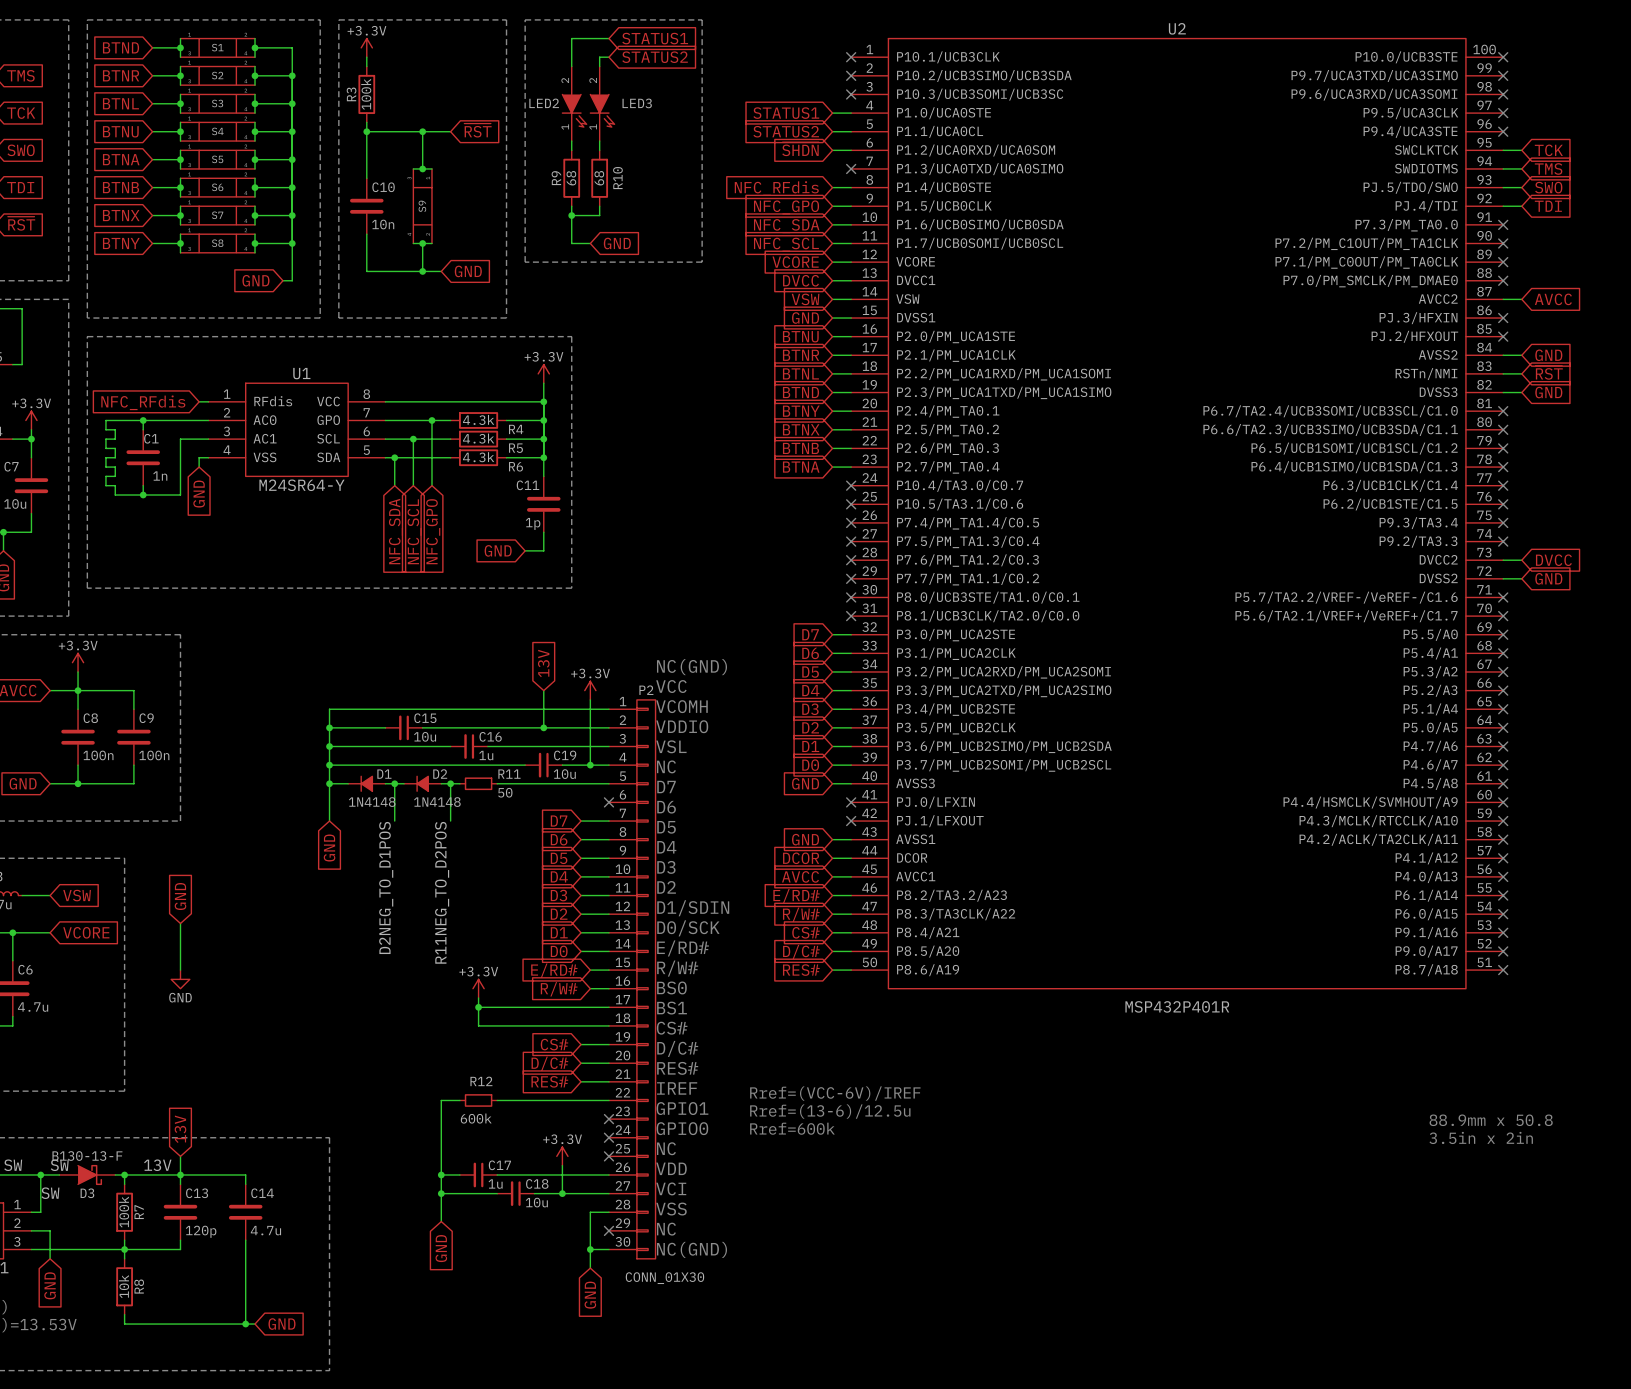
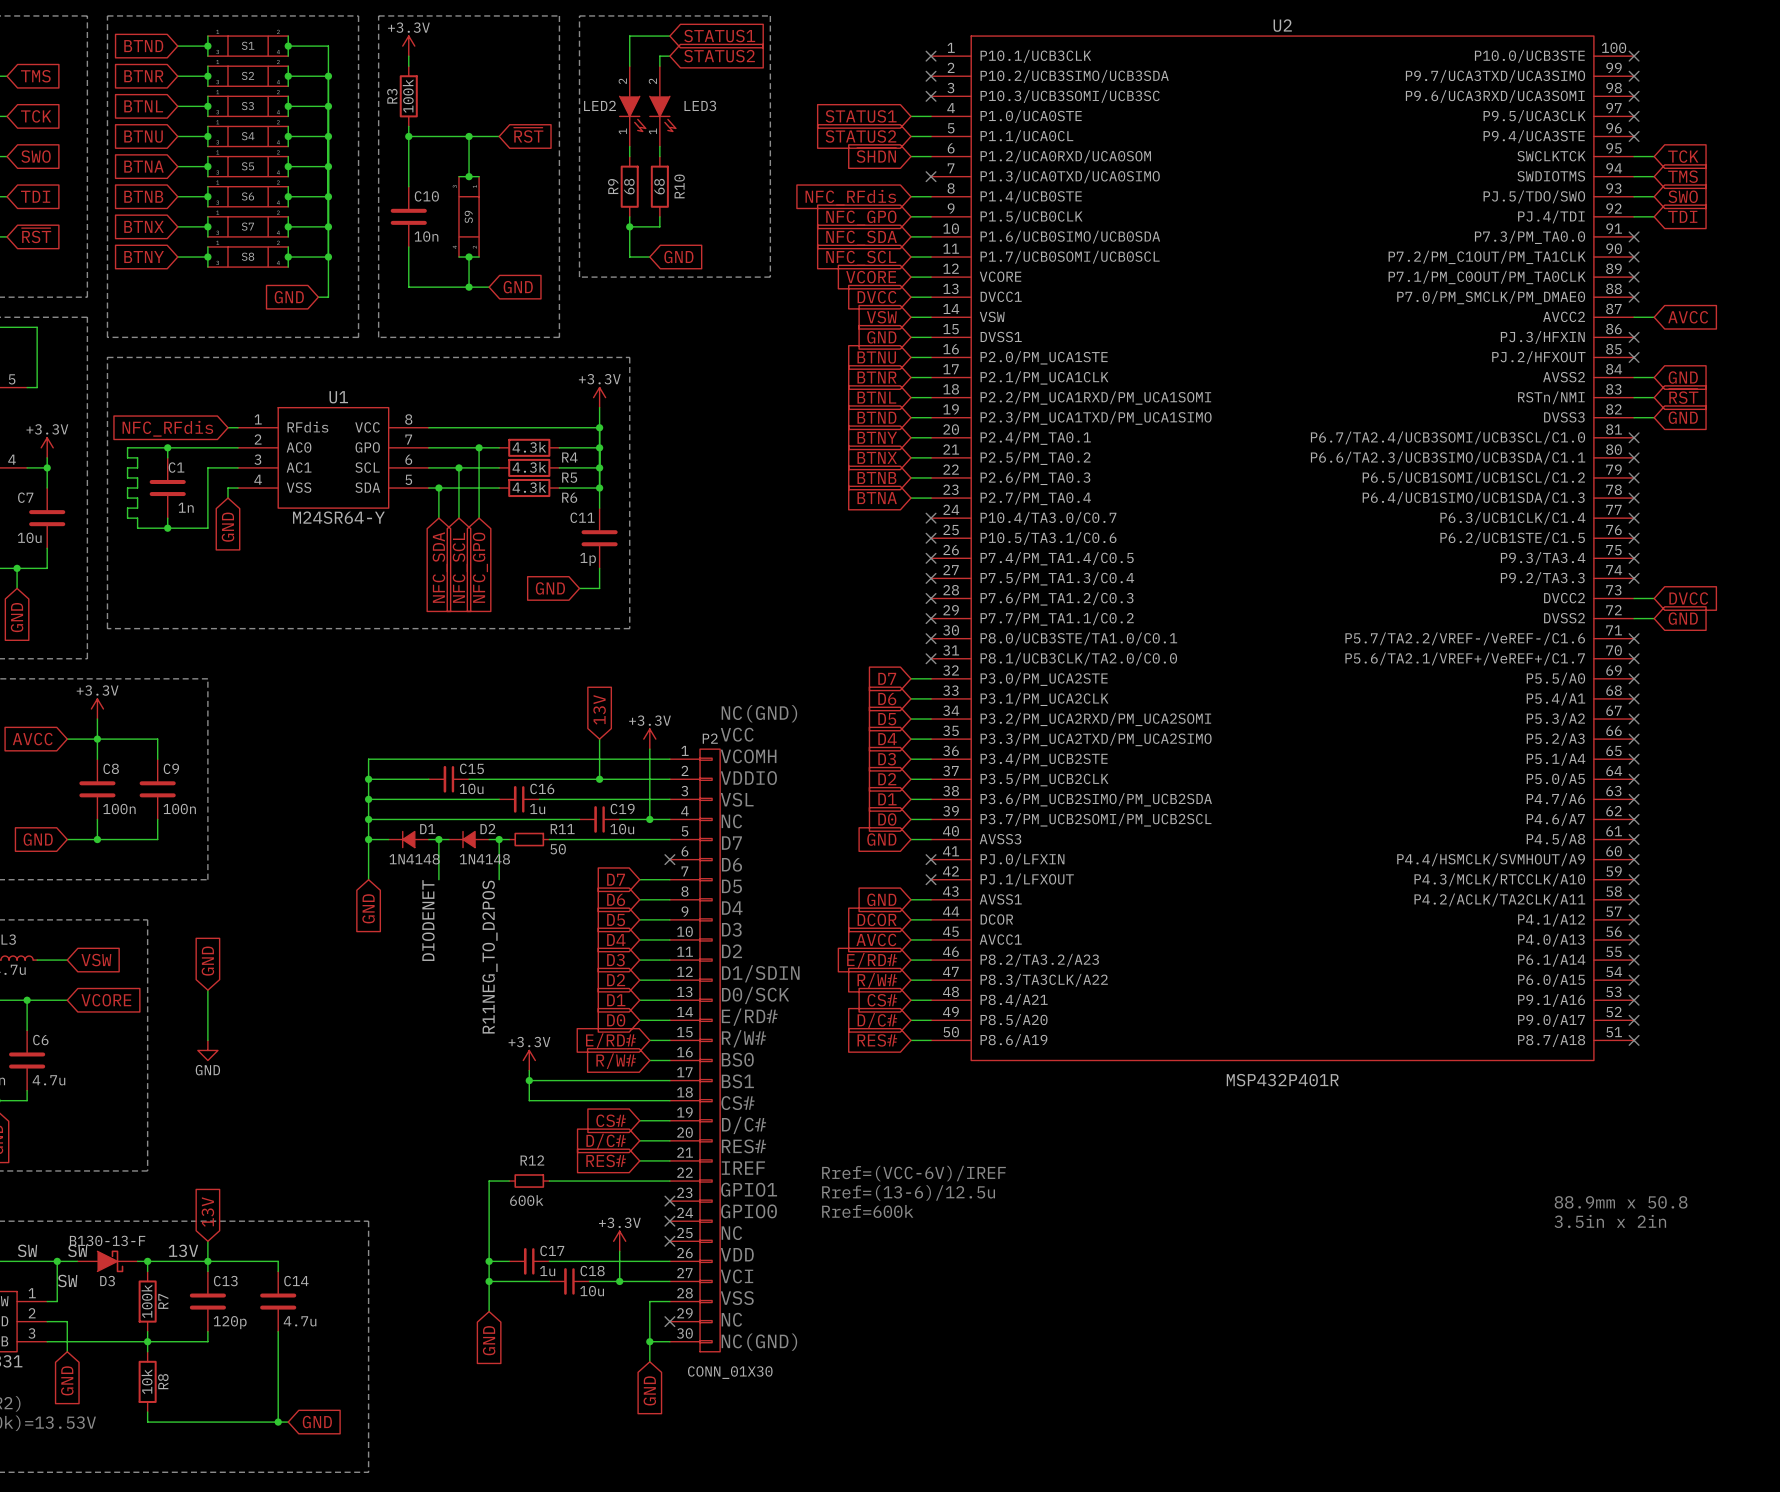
label: D2NEG_TO_D1POS (386, 887) -> DIODENET (428, 920)

